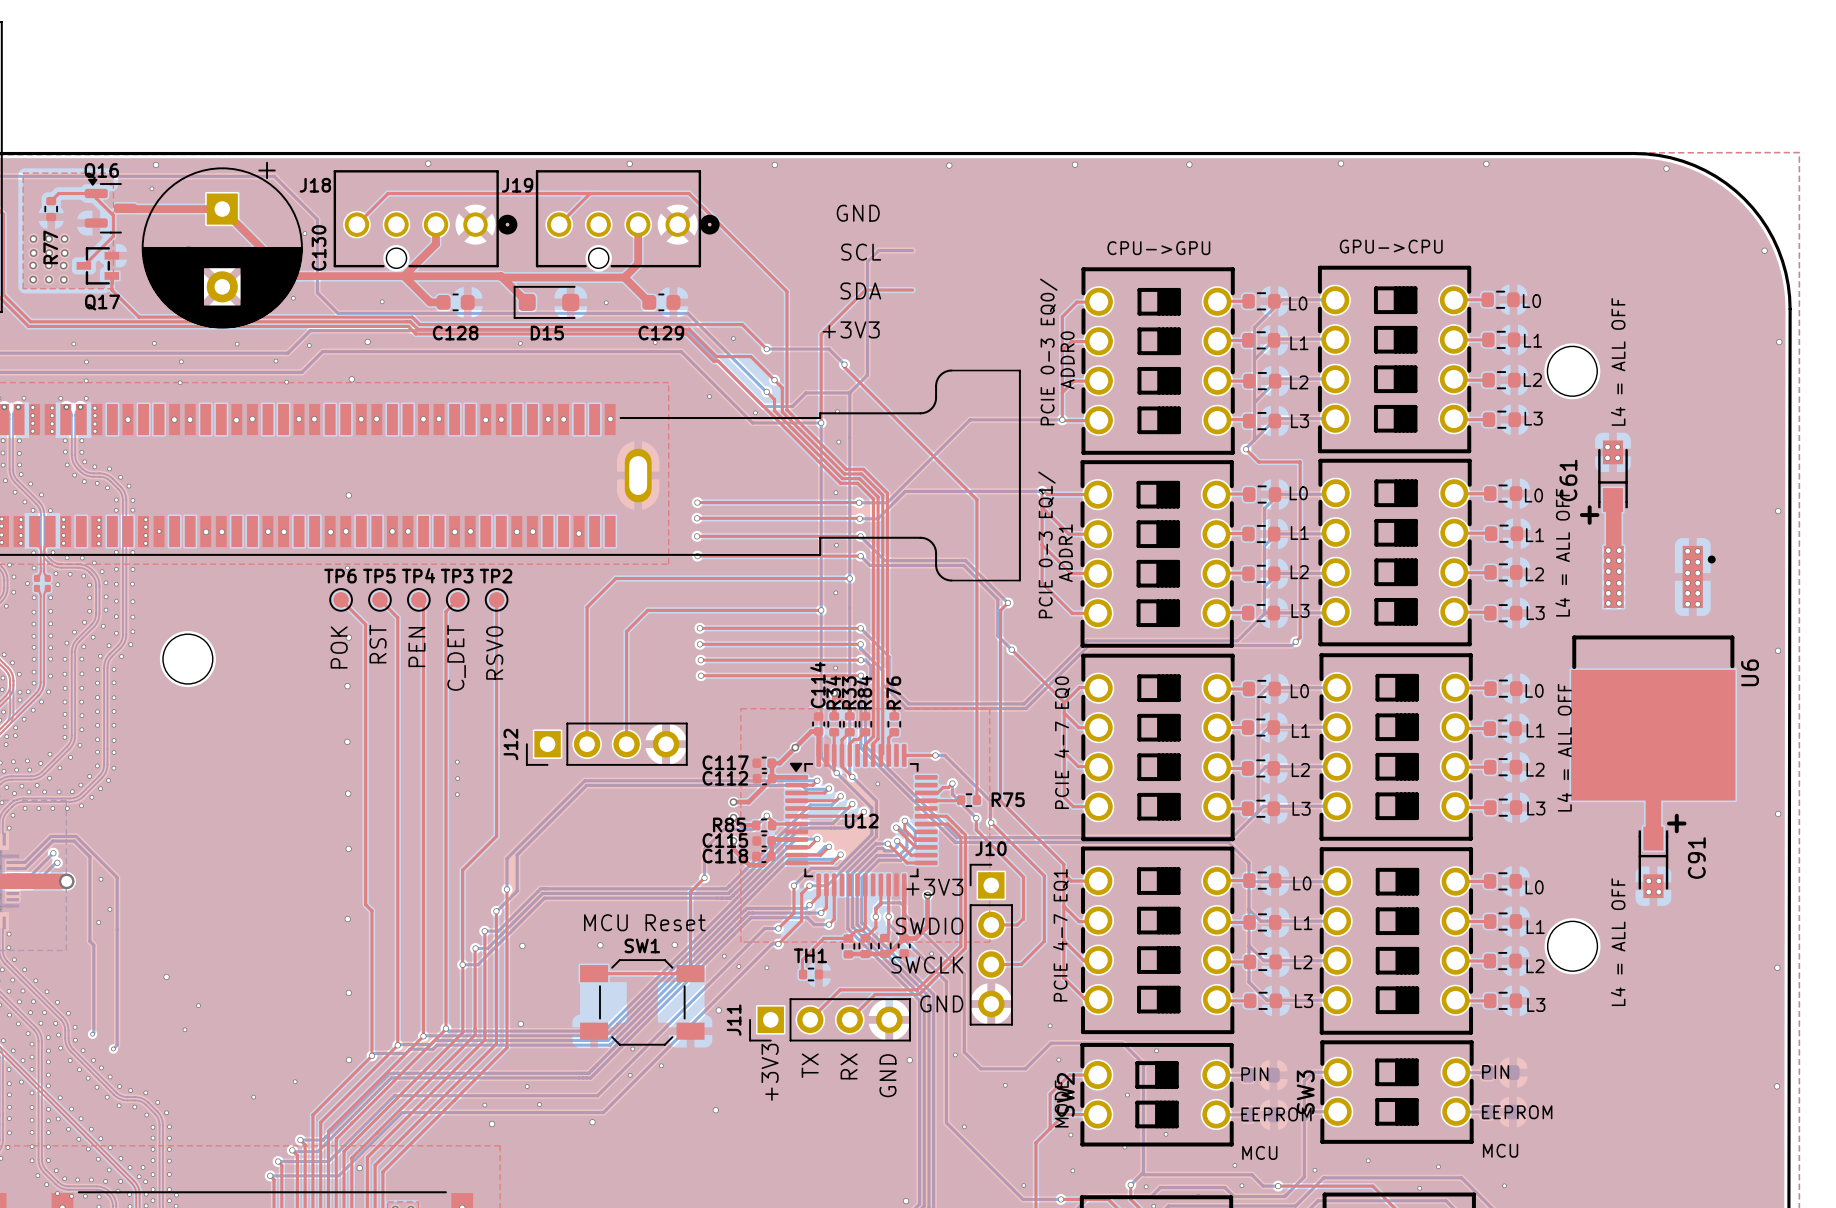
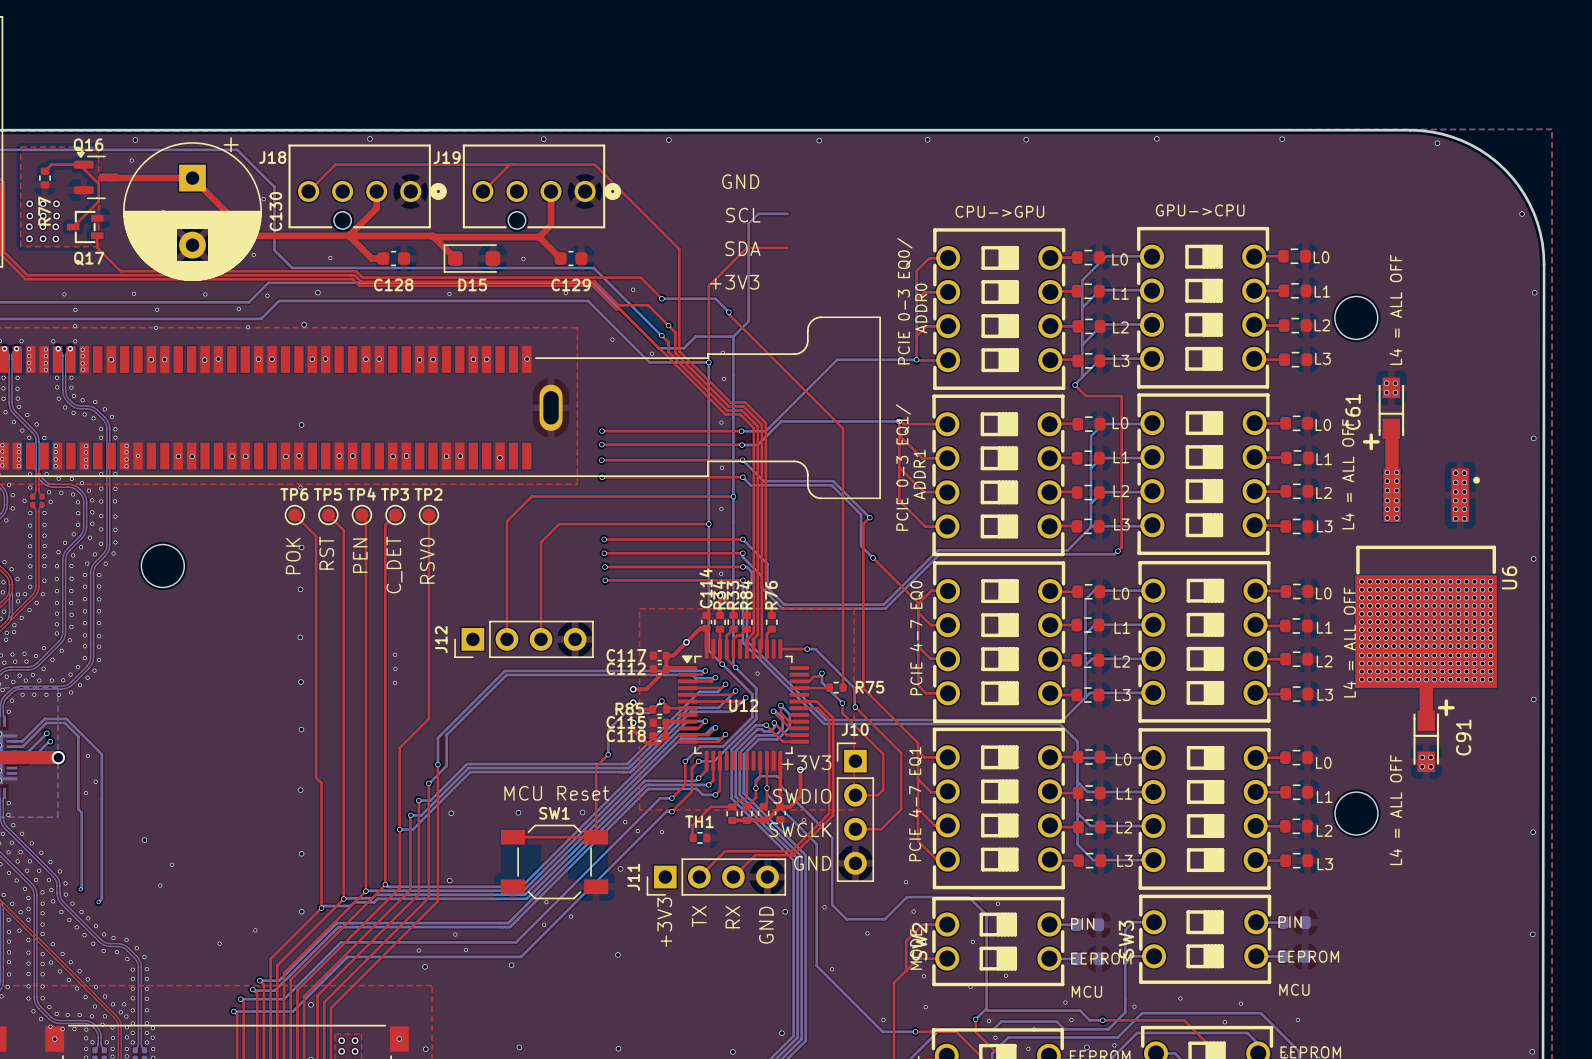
via: none -> (1361, 581)
via: none -> (1369, 581)
via: none -> (1377, 581)
via: none -> (1386, 581)
via: none -> (1394, 581)
via: none -> (1402, 581)
via: none -> (1410, 581)
via: none -> (1418, 581)
via: none -> (1426, 581)
via: none -> (1434, 581)
via: none -> (1442, 581)
via: none -> (1450, 581)
via: none -> (1458, 581)
via: none -> (1466, 581)
via: none -> (1474, 581)
via: none -> (1482, 581)
via: none -> (1490, 581)
via: none -> (1361, 589)
via: none -> (1369, 589)
via: none -> (1377, 589)
via: none -> (1386, 589)
via: none -> (1394, 589)
via: none -> (1402, 589)
via: none -> (1410, 589)
via: none -> (1418, 589)
via: none -> (1426, 589)
via: none -> (1434, 589)
via: none -> (1442, 589)
via: none -> (1450, 589)
via: none -> (1458, 589)
via: none -> (1466, 589)
via: none -> (1474, 589)
via: none -> (1482, 589)
via: none -> (1490, 589)
via: none -> (1361, 597)
via: none -> (1369, 597)
via: none -> (1377, 597)
via: none -> (1386, 597)
via: none -> (1394, 597)
via: none -> (1402, 597)
via: none -> (1410, 597)
via: none -> (1418, 597)
via: none -> (1426, 597)
via: none -> (1434, 597)
via: none -> (1442, 597)
via: none -> (1450, 597)
via: none -> (1458, 597)
via: none -> (1466, 597)
via: none -> (1474, 597)
via: none -> (1482, 597)
via: none -> (1490, 597)
via: none -> (1361, 605)
via: none -> (1369, 605)
via: none -> (1377, 605)
via: none -> (1386, 605)
via: none -> (1394, 605)
via: none -> (1402, 605)
via: none -> (1410, 605)
via: none -> (1418, 605)
via: none -> (1426, 605)
via: none -> (1434, 605)
via: none -> (1442, 605)
via: none -> (1450, 605)
via: none -> (1458, 605)
via: none -> (1466, 605)
via: none -> (1474, 605)
via: none -> (1482, 605)
via: none -> (1490, 605)
via: none -> (1361, 613)
via: none -> (1369, 613)
via: none -> (1377, 613)
via: none -> (1386, 613)
via: none -> (1394, 613)
via: none -> (1402, 613)
via: none -> (1410, 613)
via: none -> (1418, 613)
via: none -> (1426, 613)
via: none -> (1434, 613)
via: none -> (1442, 613)
via: none -> (1450, 613)
via: none -> (1458, 613)
via: none -> (1466, 613)
via: none -> (1474, 613)
via: none -> (1482, 613)
via: none -> (1490, 613)
via: none -> (1361, 621)
via: none -> (1369, 621)
via: none -> (1377, 621)
via: none -> (1386, 621)
via: none -> (1394, 621)
via: none -> (1402, 621)
via: none -> (1410, 621)
via: none -> (1418, 621)
via: none -> (1426, 621)
via: none -> (1434, 621)
via: none -> (1442, 621)
via: none -> (1450, 621)
via: none -> (1458, 621)
via: none -> (1466, 621)
via: none -> (1474, 621)
via: none -> (1482, 621)
via: none -> (1490, 621)
via: none -> (1361, 629)
via: none -> (1369, 629)
via: none -> (1377, 629)
via: none -> (1386, 629)
via: none -> (1394, 629)
via: none -> (1402, 629)
via: none -> (1410, 629)
via: none -> (1418, 629)
via: none -> (1426, 629)
via: none -> (1434, 629)
via: none -> (1442, 629)
via: none -> (1450, 629)
via: none -> (1458, 629)
via: none -> (1466, 629)
via: none -> (1474, 629)
via: none -> (1482, 629)
via: none -> (1490, 629)
via: none -> (1361, 638)
via: none -> (1369, 638)
via: none -> (1377, 638)
via: none -> (1386, 638)
via: none -> (1394, 638)
via: none -> (1402, 638)
via: none -> (1410, 638)
via: none -> (1418, 638)
via: none -> (1426, 638)
via: none -> (1434, 638)
via: none -> (1442, 638)
via: none -> (1450, 638)
via: none -> (1458, 638)
via: none -> (1466, 638)
via: none -> (1474, 638)
via: none -> (1482, 638)
via: none -> (1490, 638)
via: none -> (1361, 646)
via: none -> (1369, 646)
via: none -> (1377, 646)
via: none -> (1386, 646)
via: none -> (1394, 646)
via: none -> (1402, 646)
via: none -> (1410, 646)
via: none -> (1418, 646)
via: none -> (1426, 646)
via: none -> (1434, 646)
via: none -> (1442, 646)
via: none -> (1450, 646)
via: none -> (1458, 646)
via: none -> (1466, 646)
via: none -> (1474, 646)
via: none -> (1482, 646)
via: none -> (1490, 646)
via: none -> (1361, 655)
via: none -> (1369, 655)
via: none -> (1377, 655)
via: none -> (1386, 655)
via: none -> (1394, 655)
via: none -> (1402, 655)
via: none -> (1410, 655)
via: none -> (1418, 655)
via: none -> (1426, 655)
via: none -> (1434, 655)
via: none -> (1442, 655)
via: none -> (1450, 655)
via: none -> (1458, 655)
via: none -> (1466, 655)
via: none -> (1474, 655)
via: none -> (1482, 655)
via: none -> (1490, 655)
via: none -> (1361, 663)
via: none -> (1369, 663)
via: none -> (1377, 663)
via: none -> (1386, 663)
via: none -> (1394, 663)
via: none -> (1402, 663)
via: none -> (1410, 663)
via: none -> (1418, 663)
via: none -> (1426, 663)
via: none -> (1434, 663)
via: none -> (1442, 663)
via: none -> (1450, 663)
via: none -> (1458, 663)
via: none -> (1466, 663)
via: none -> (1474, 663)
via: none -> (1482, 663)
via: none -> (1490, 663)
via: none -> (1361, 671)
via: none -> (1369, 671)
via: none -> (1377, 671)
via: none -> (1386, 671)
via: none -> (1394, 671)
via: none -> (1402, 671)
via: none -> (1410, 671)
via: none -> (1418, 671)
via: none -> (1426, 671)
via: none -> (1434, 671)
via: none -> (1442, 671)
via: none -> (1450, 671)
via: none -> (1458, 671)
via: none -> (1466, 671)
via: none -> (1474, 671)
via: none -> (1482, 671)
via: none -> (1490, 671)
via: none -> (1361, 679)
via: none -> (1369, 679)
via: none -> (1377, 679)
via: none -> (1386, 679)
via: none -> (1394, 679)
via: none -> (1402, 679)
via: none -> (1410, 679)
via: none -> (1418, 679)
via: none -> (1426, 679)
via: none -> (1434, 679)
via: none -> (1442, 679)
via: none -> (1450, 679)
via: none -> (1458, 679)
via: none -> (1466, 679)
via: none -> (1474, 679)
via: none -> (1482, 679)
via: none -> (1490, 679)

